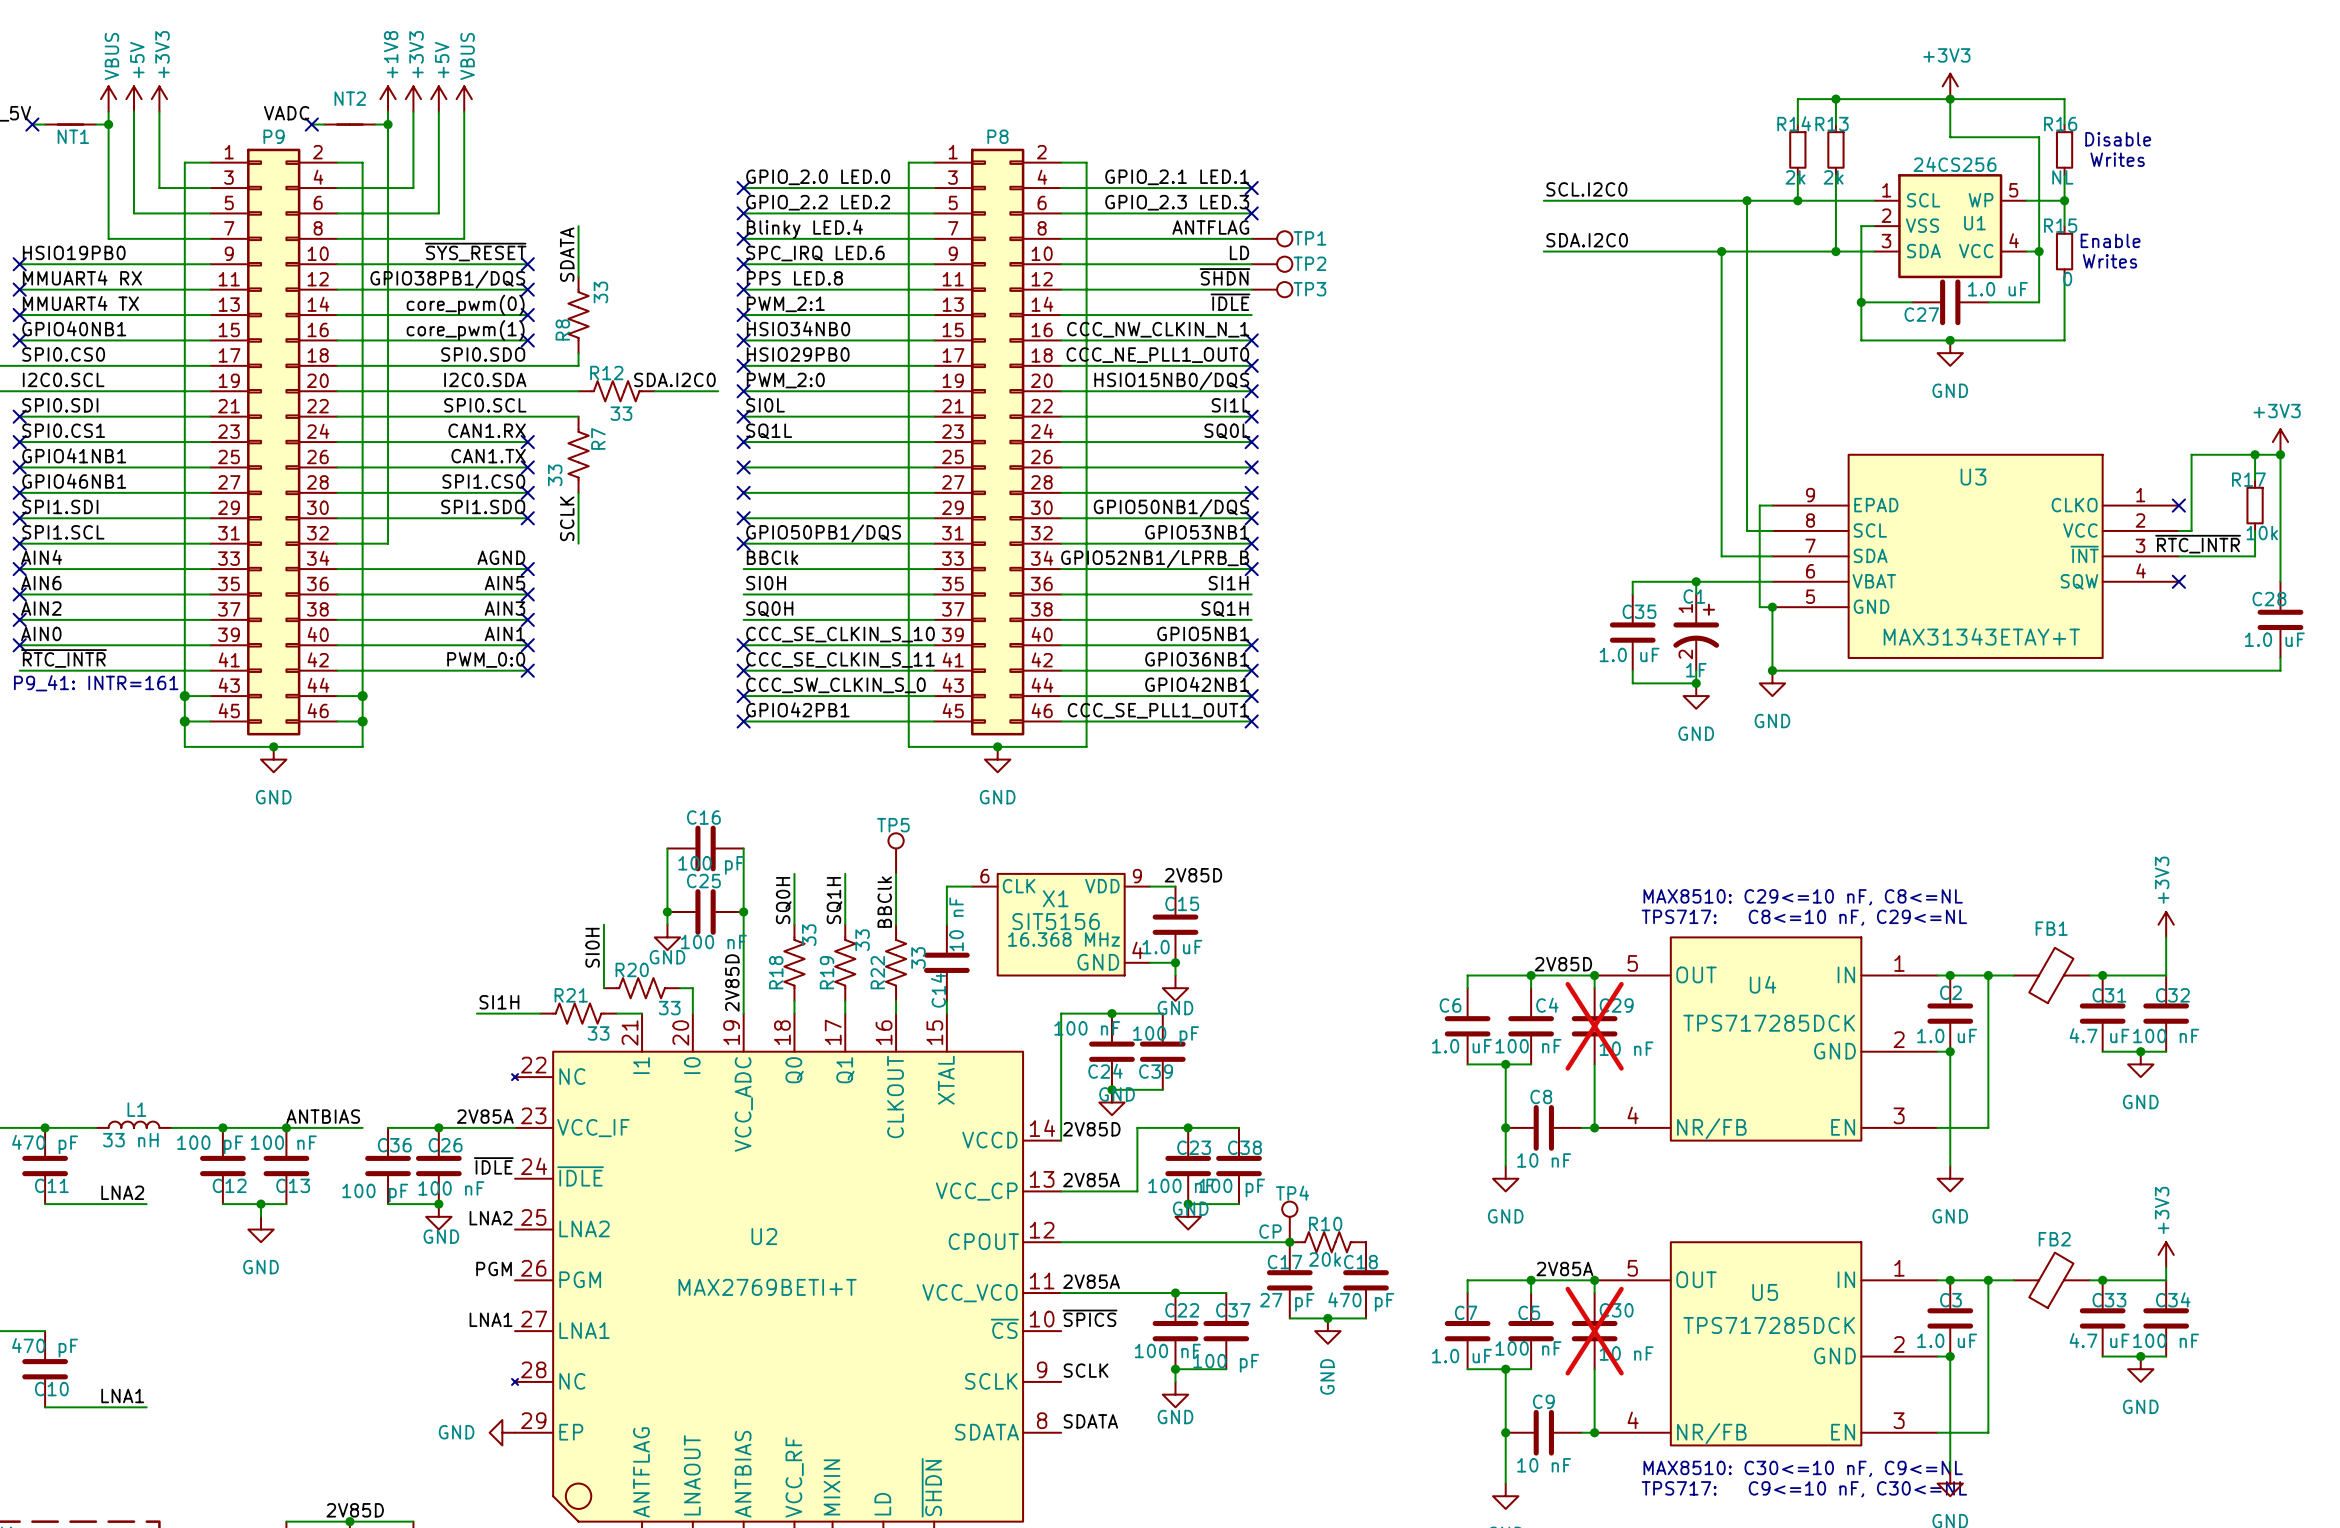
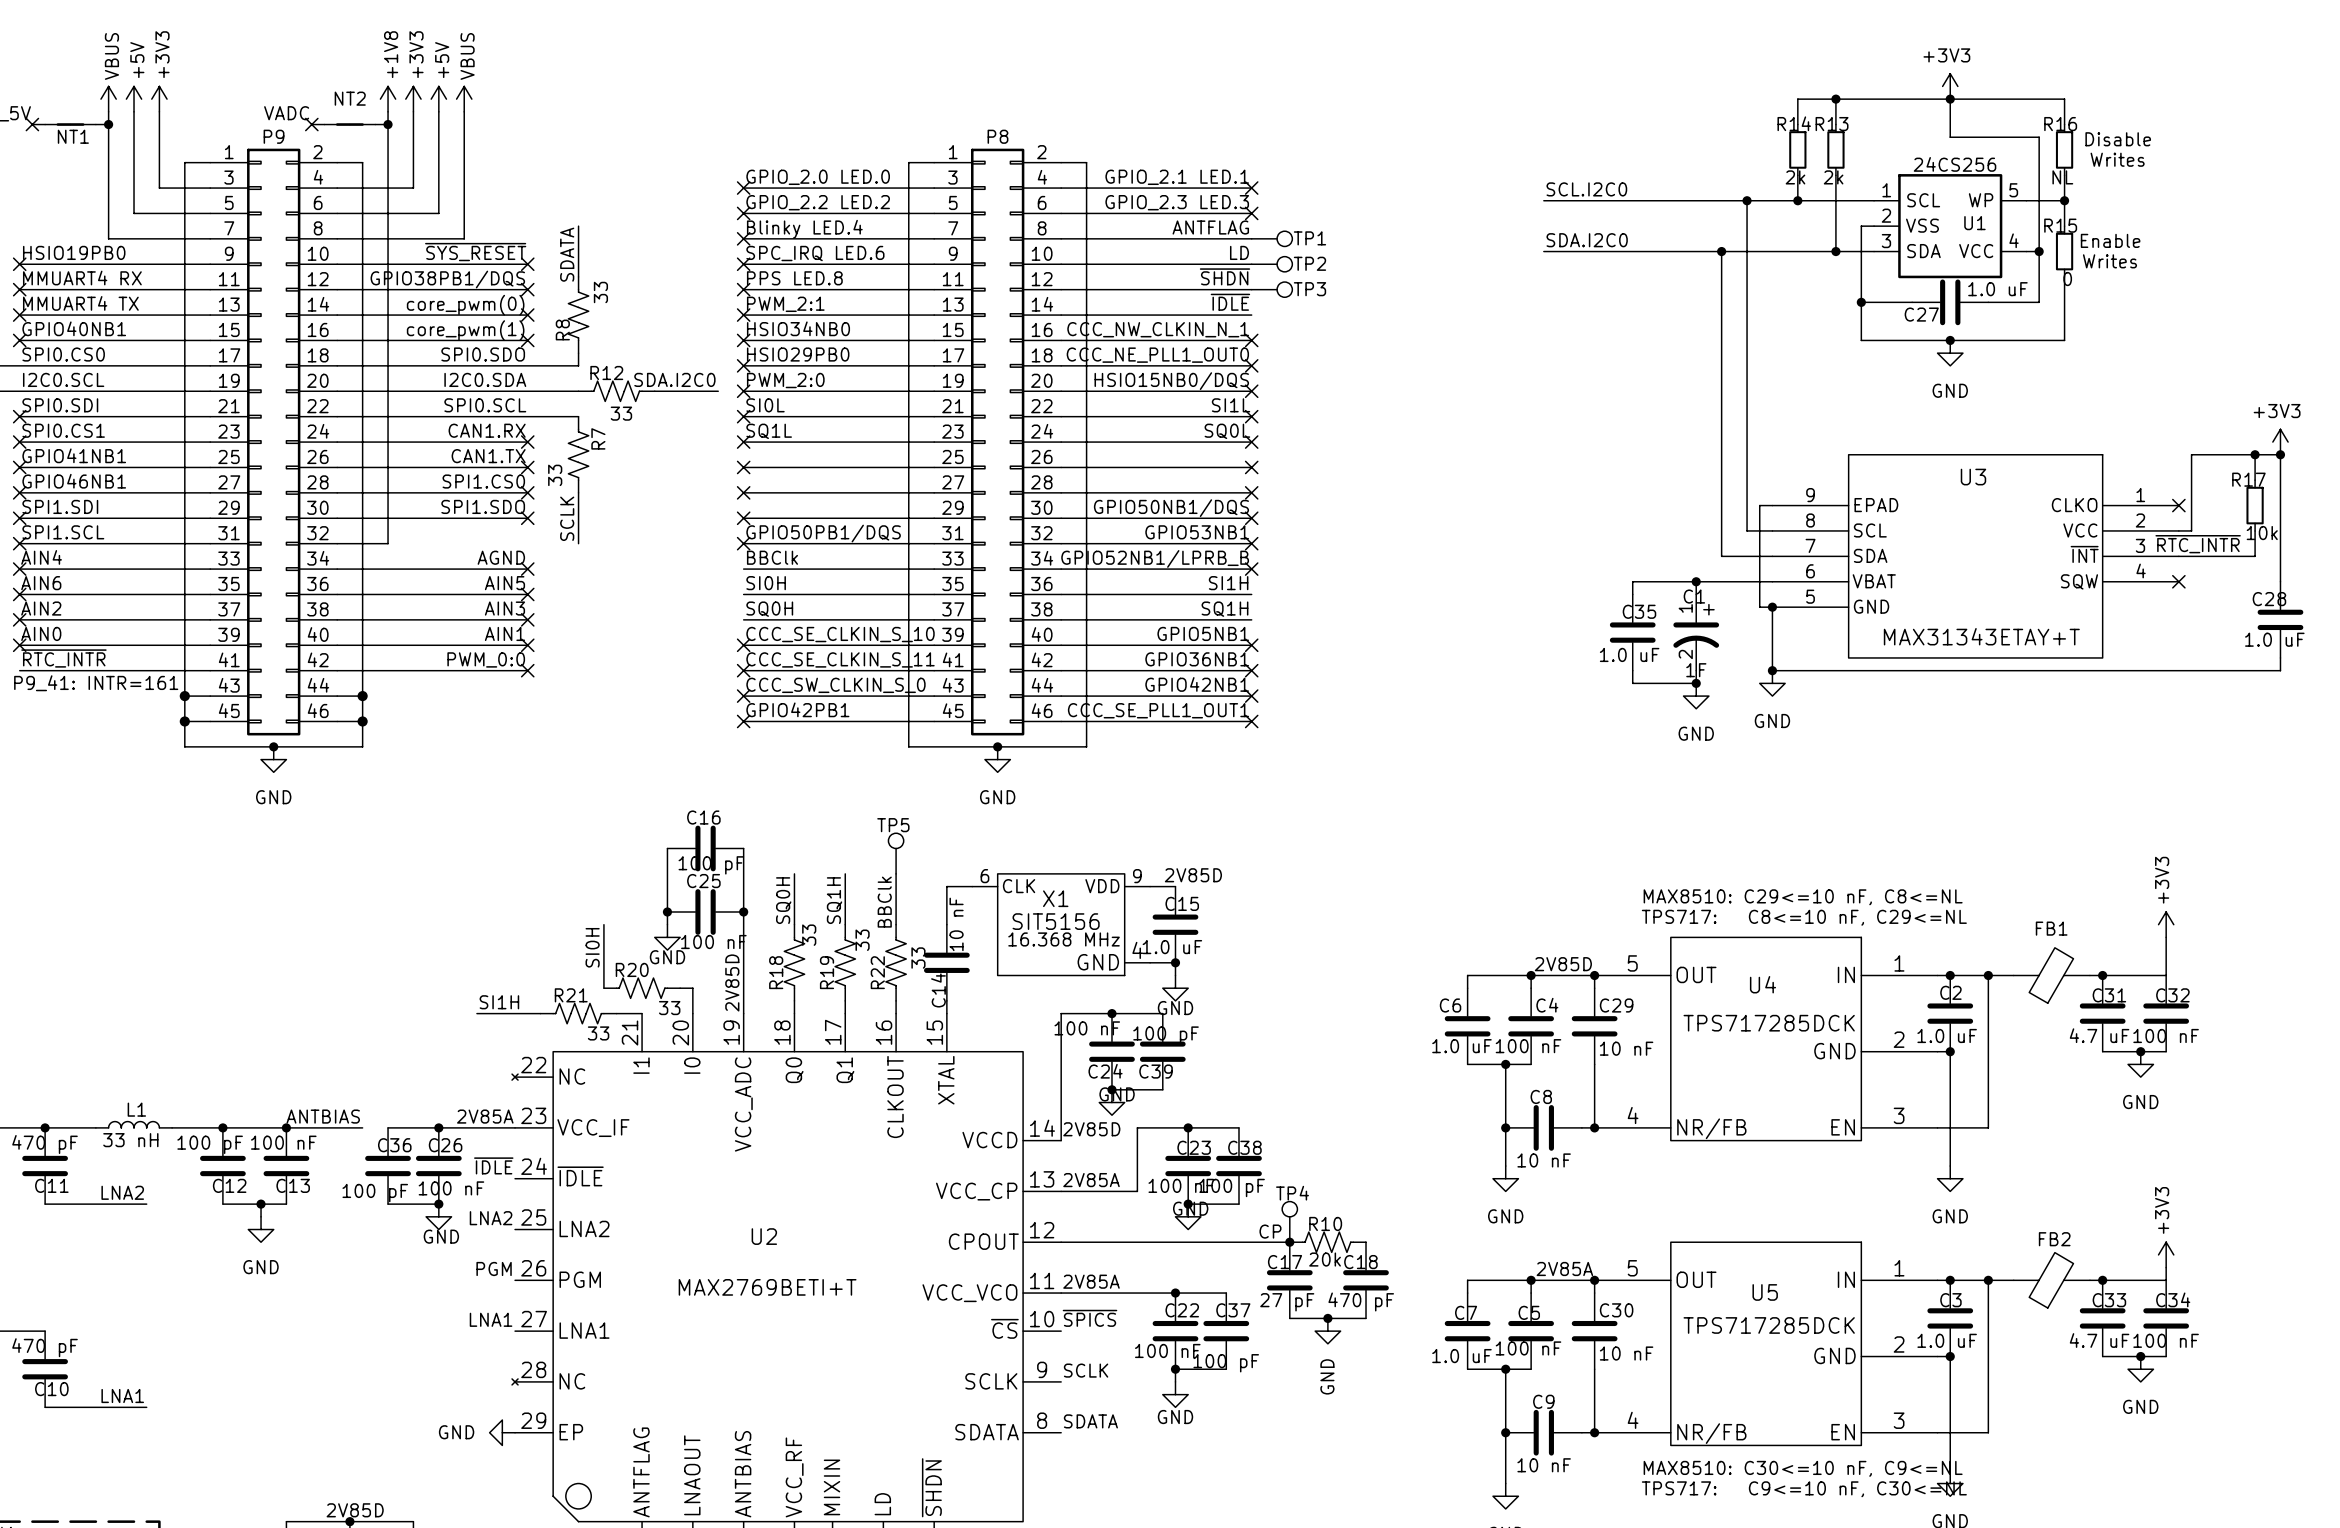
C29 do-not-place cross: (1594, 1026) -> none
C30 do-not-place cross: (1594, 1331) -> none

